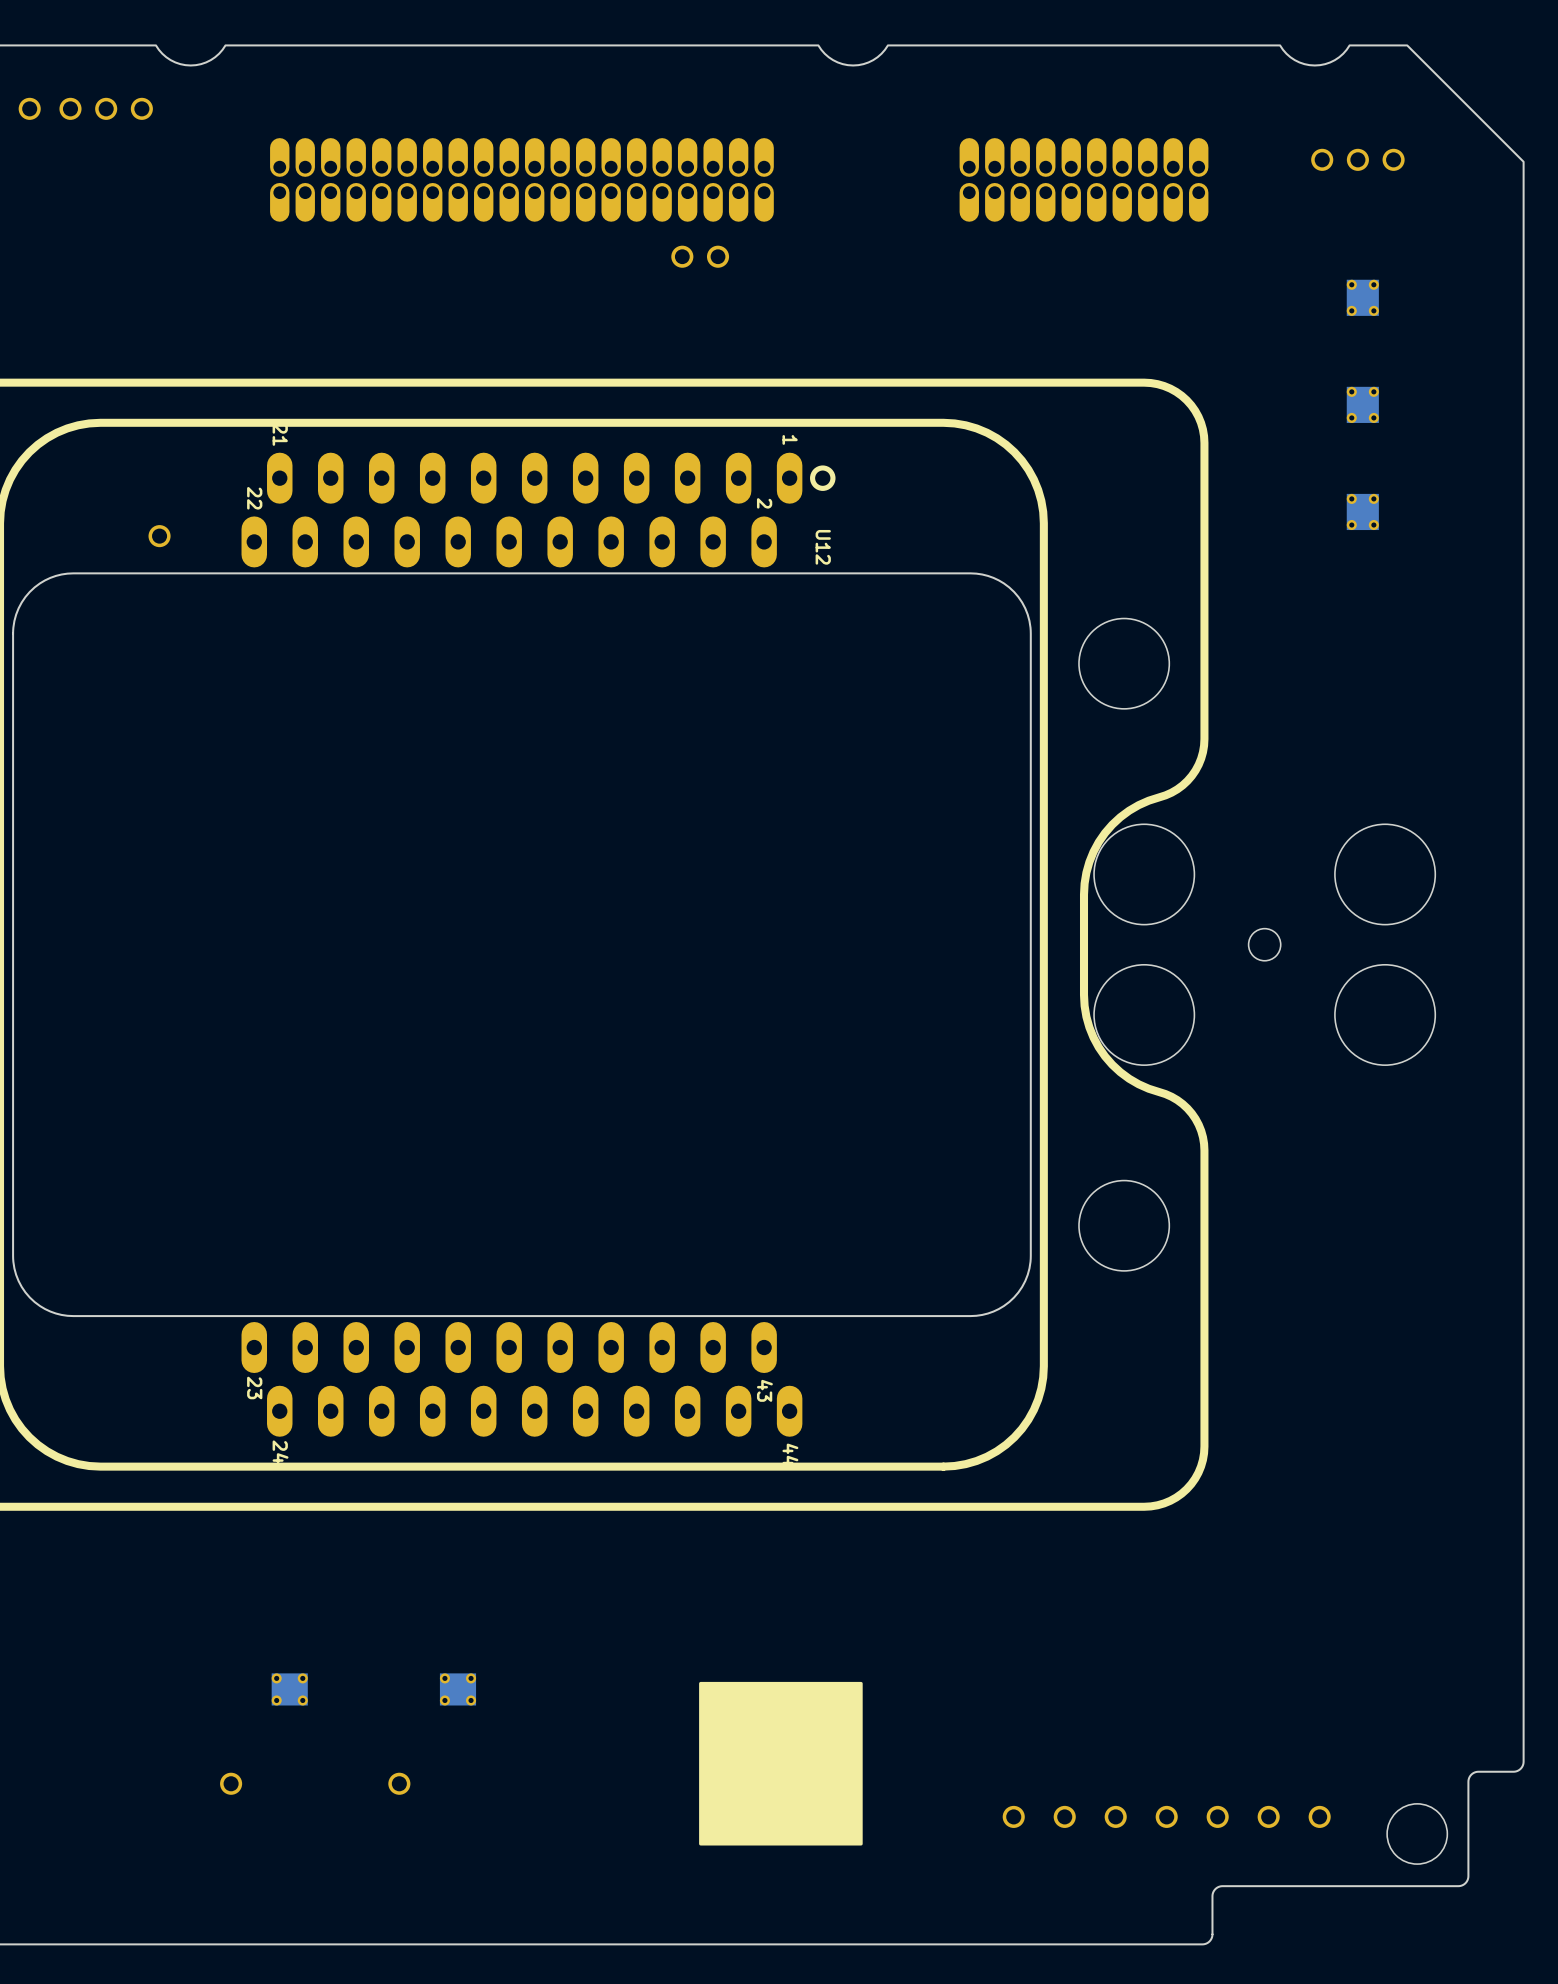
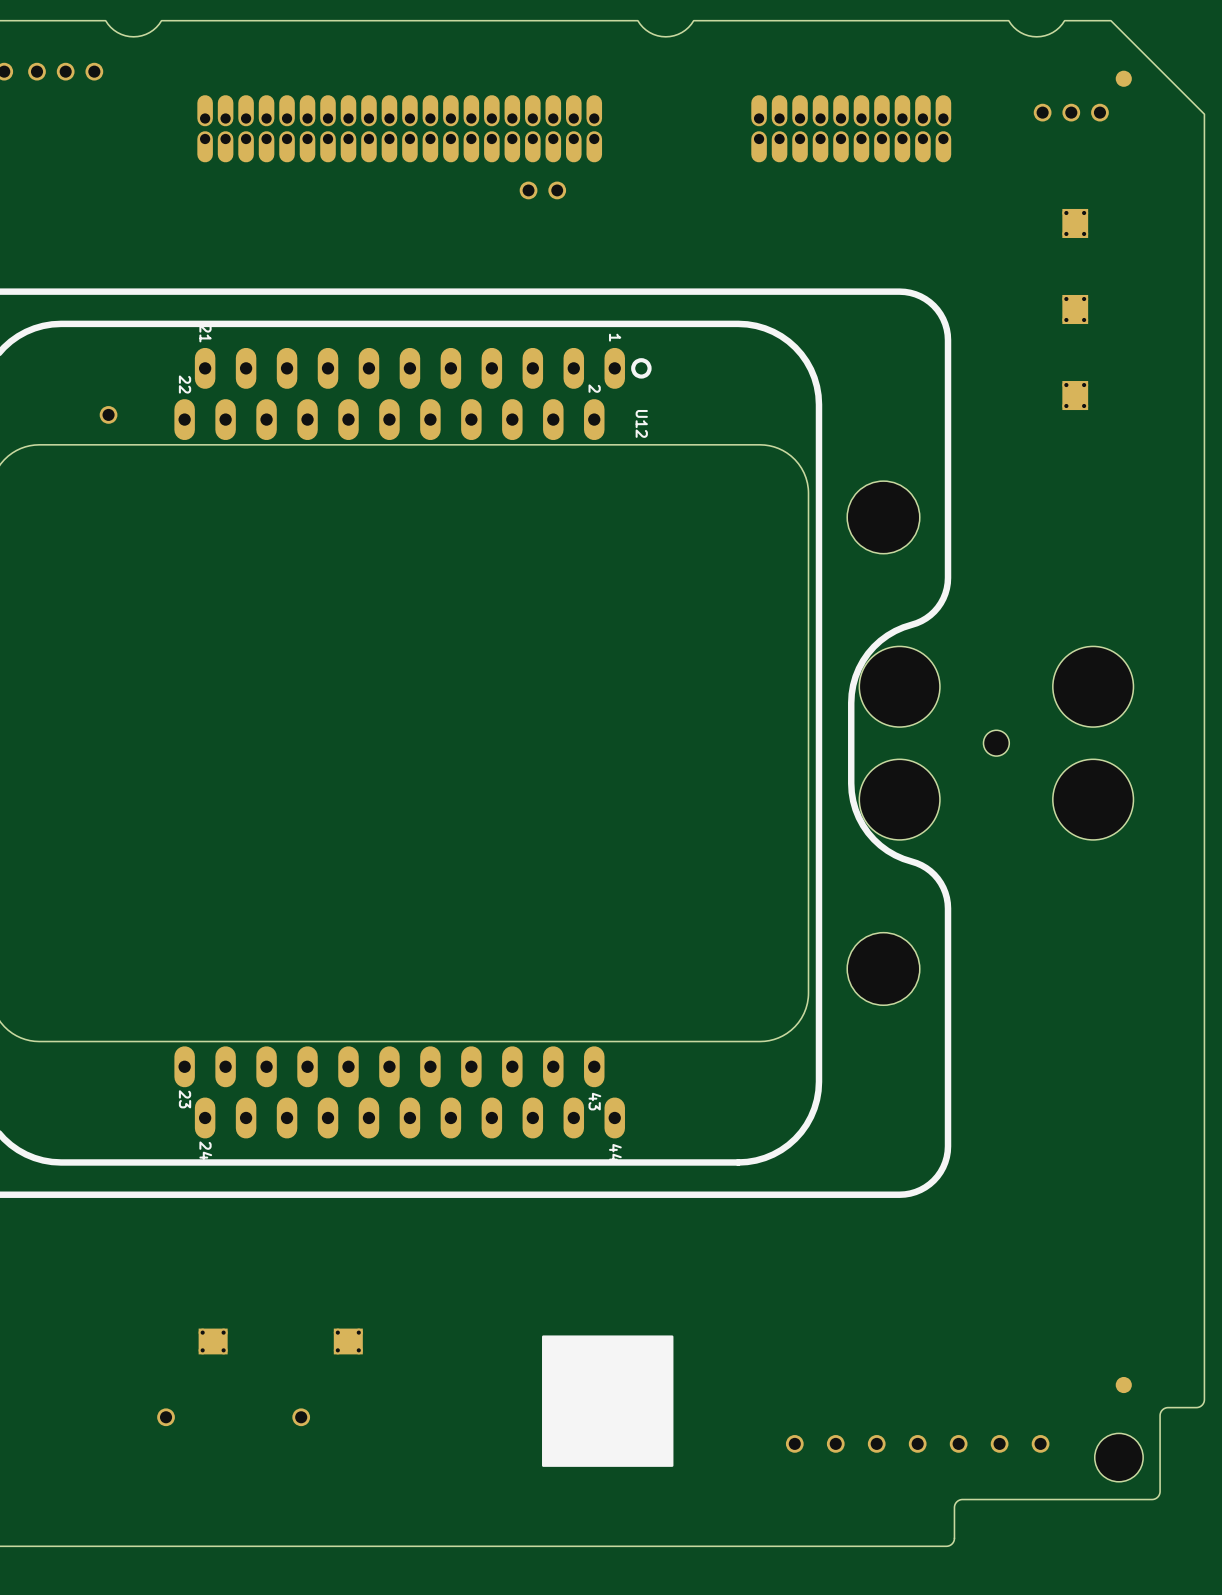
part: none -> (1123, 78)
part: none -> (1123, 1385)

